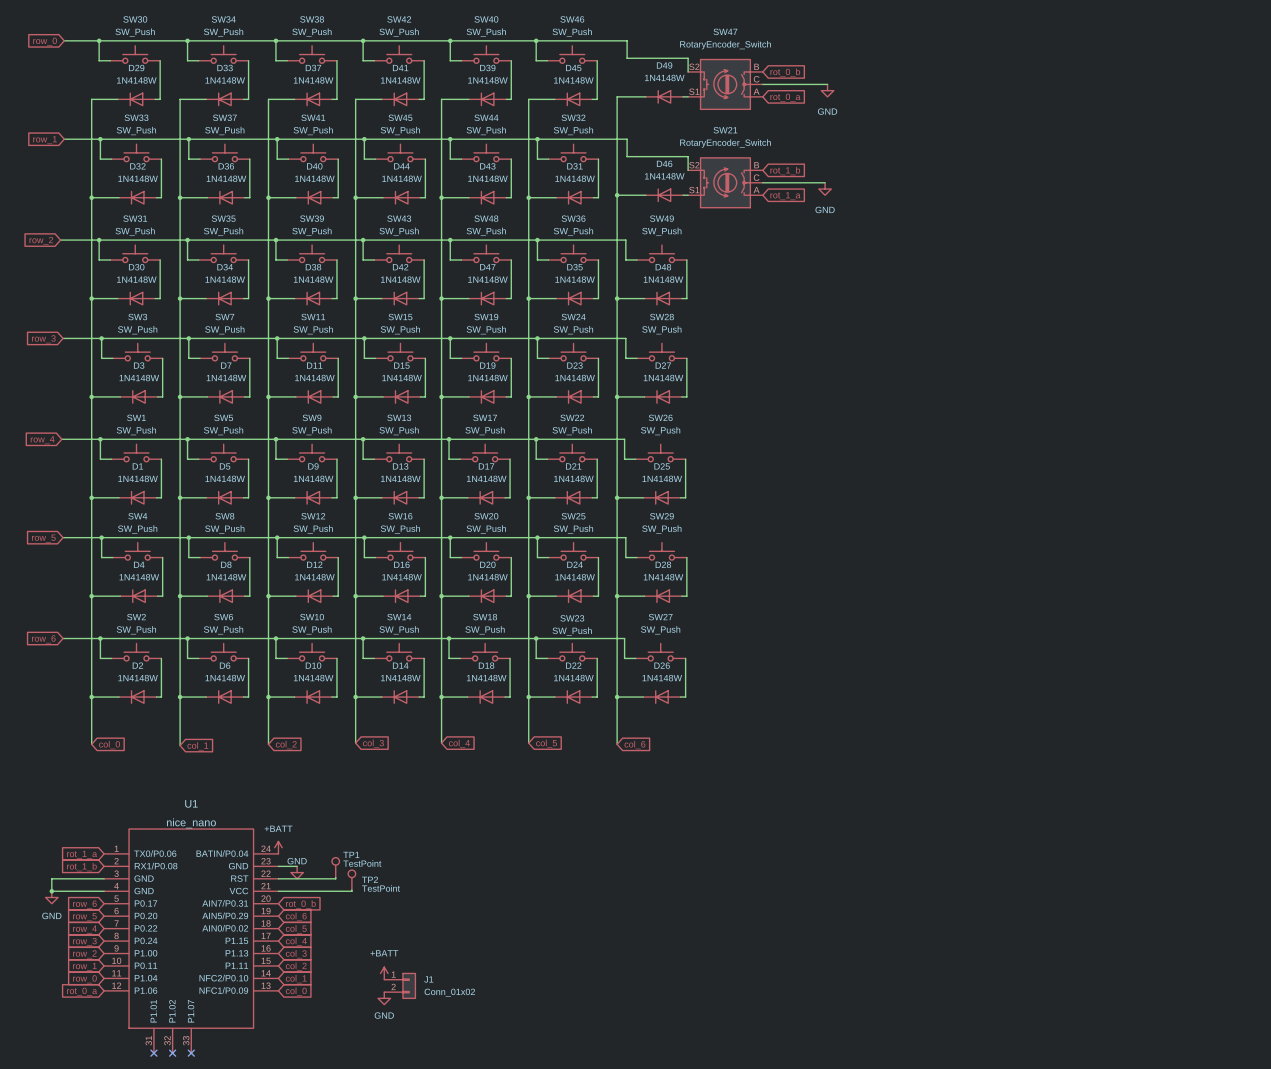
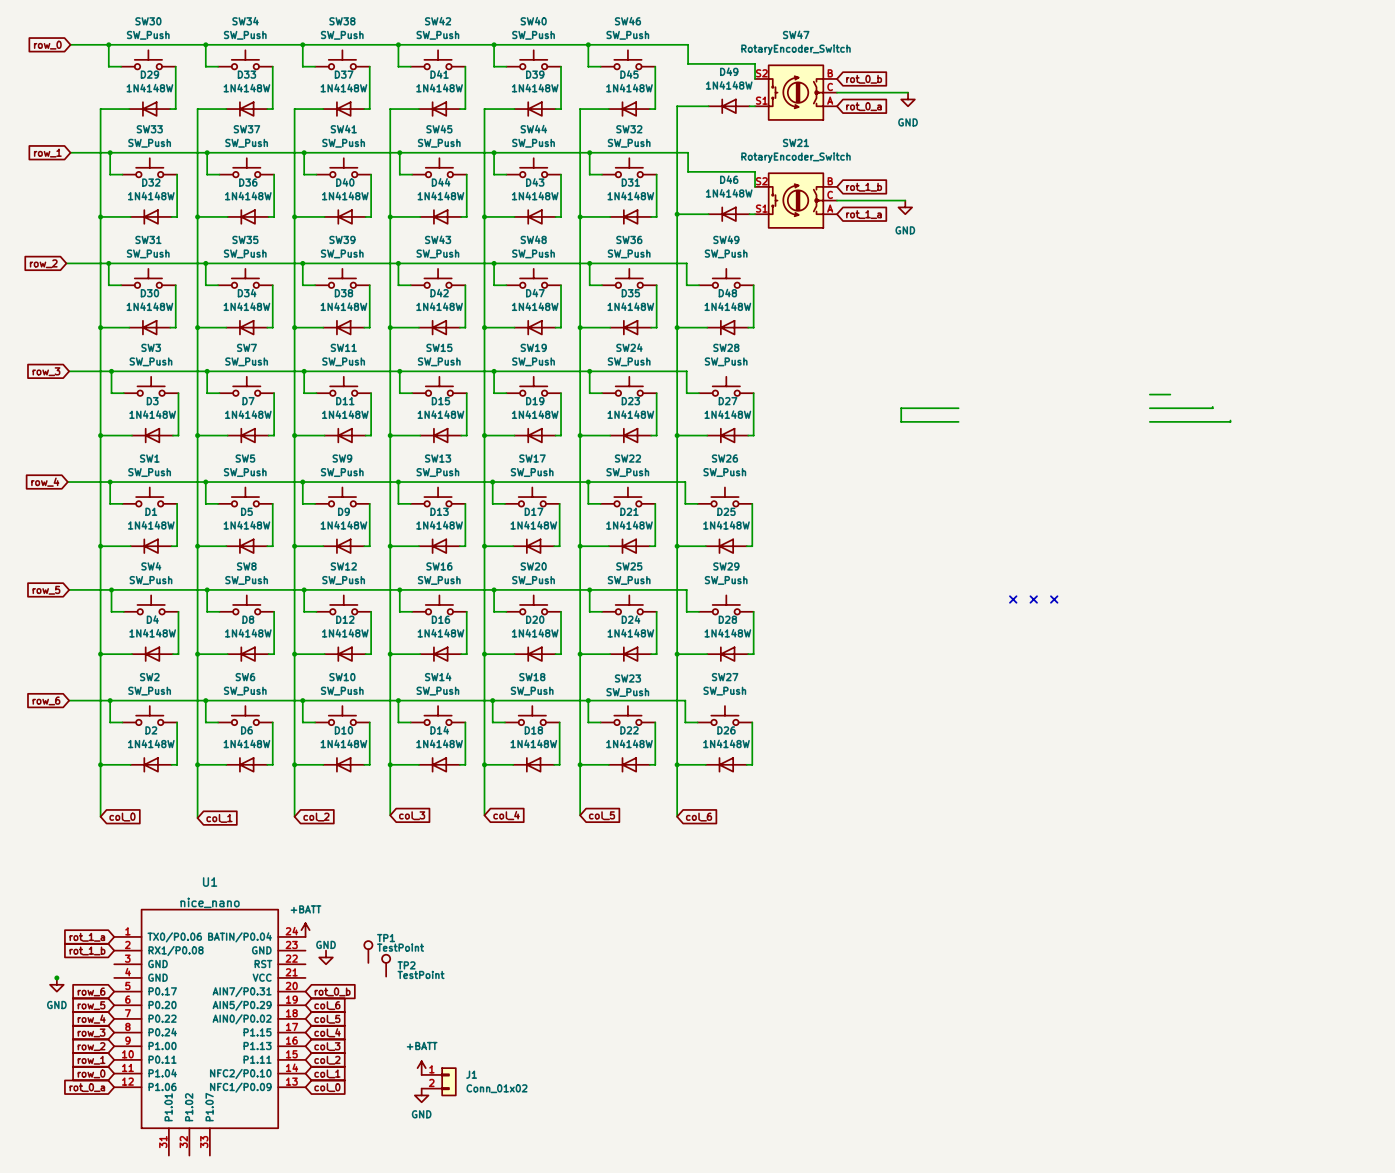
wire: none -> (1149, 394) (1170, 394)
wire: none -> (1212, 406) (1149, 408)
wire: none -> (958, 408) (901, 408) (901, 421) (958, 421)
wire: none -> (1230, 420) (1149, 421)
no-connect mark: none -> (1013, 599)
no-connect mark: none -> (1033, 599)
no-connect mark: none -> (1054, 599)
wire: (278, 866) (297, 866) -> none
wire: (335, 877) (278, 878) -> none
wire: (104, 878) (51, 878) (51, 891) (104, 891) -> none
wire: (351, 890) (278, 891) -> none
no-connect mark: (153, 1053) -> none
no-connect mark: (172, 1053) -> none
no-connect mark: (191, 1053) -> none

